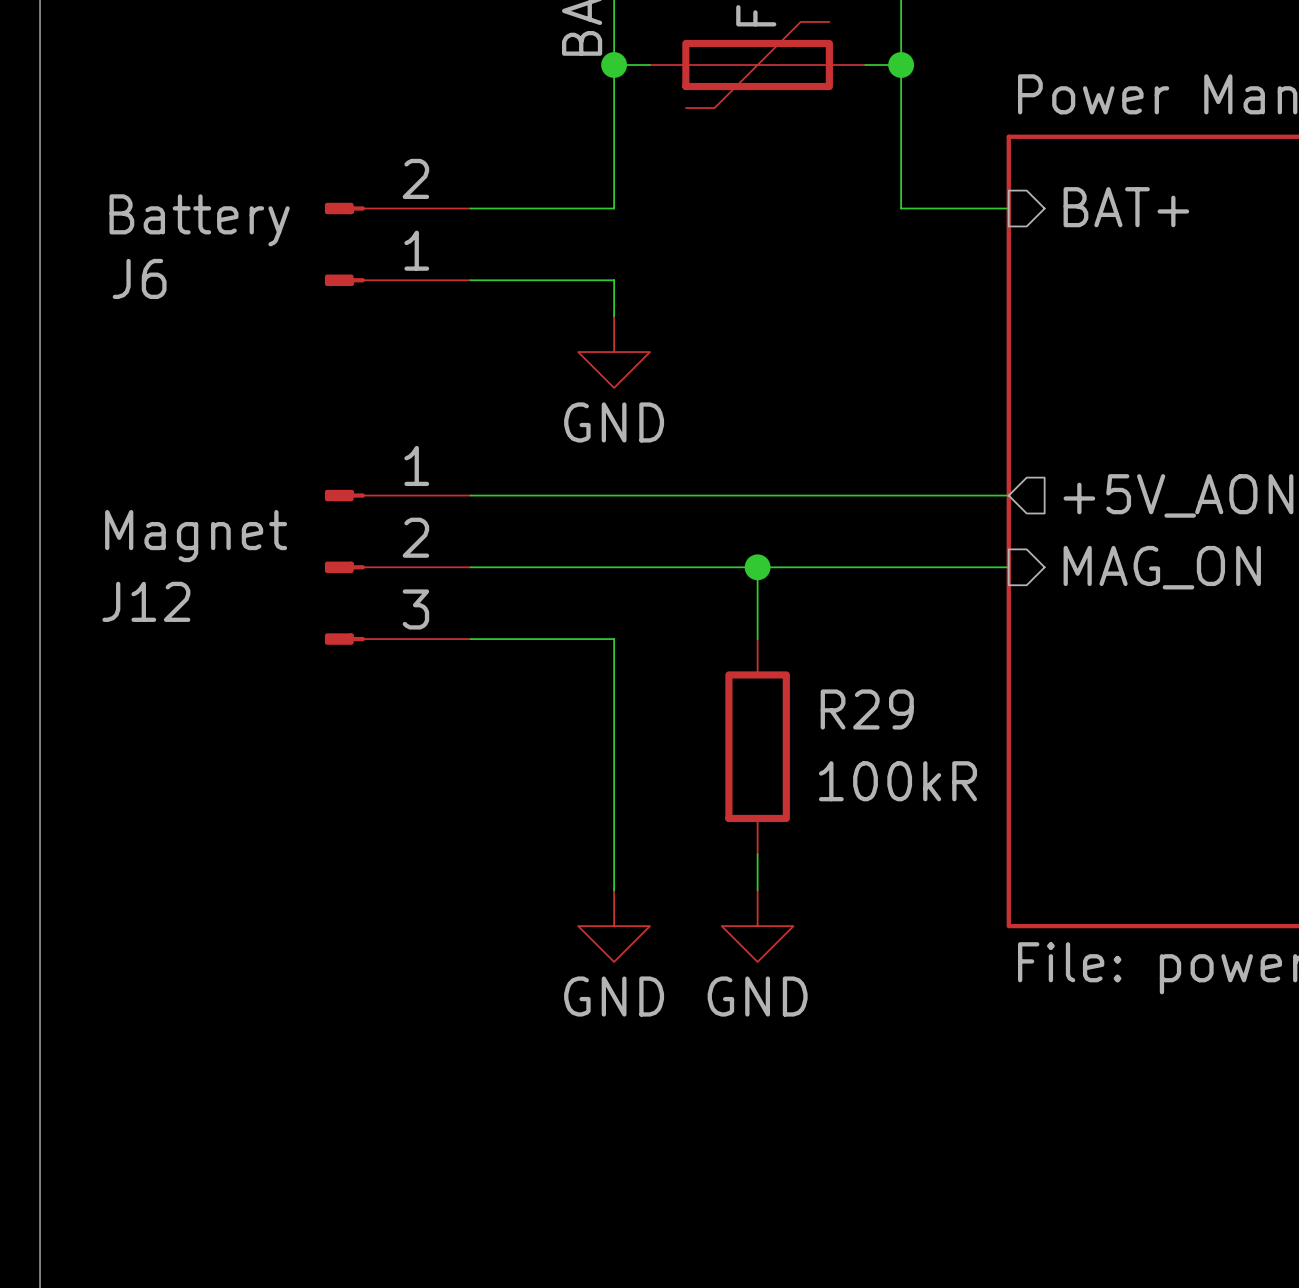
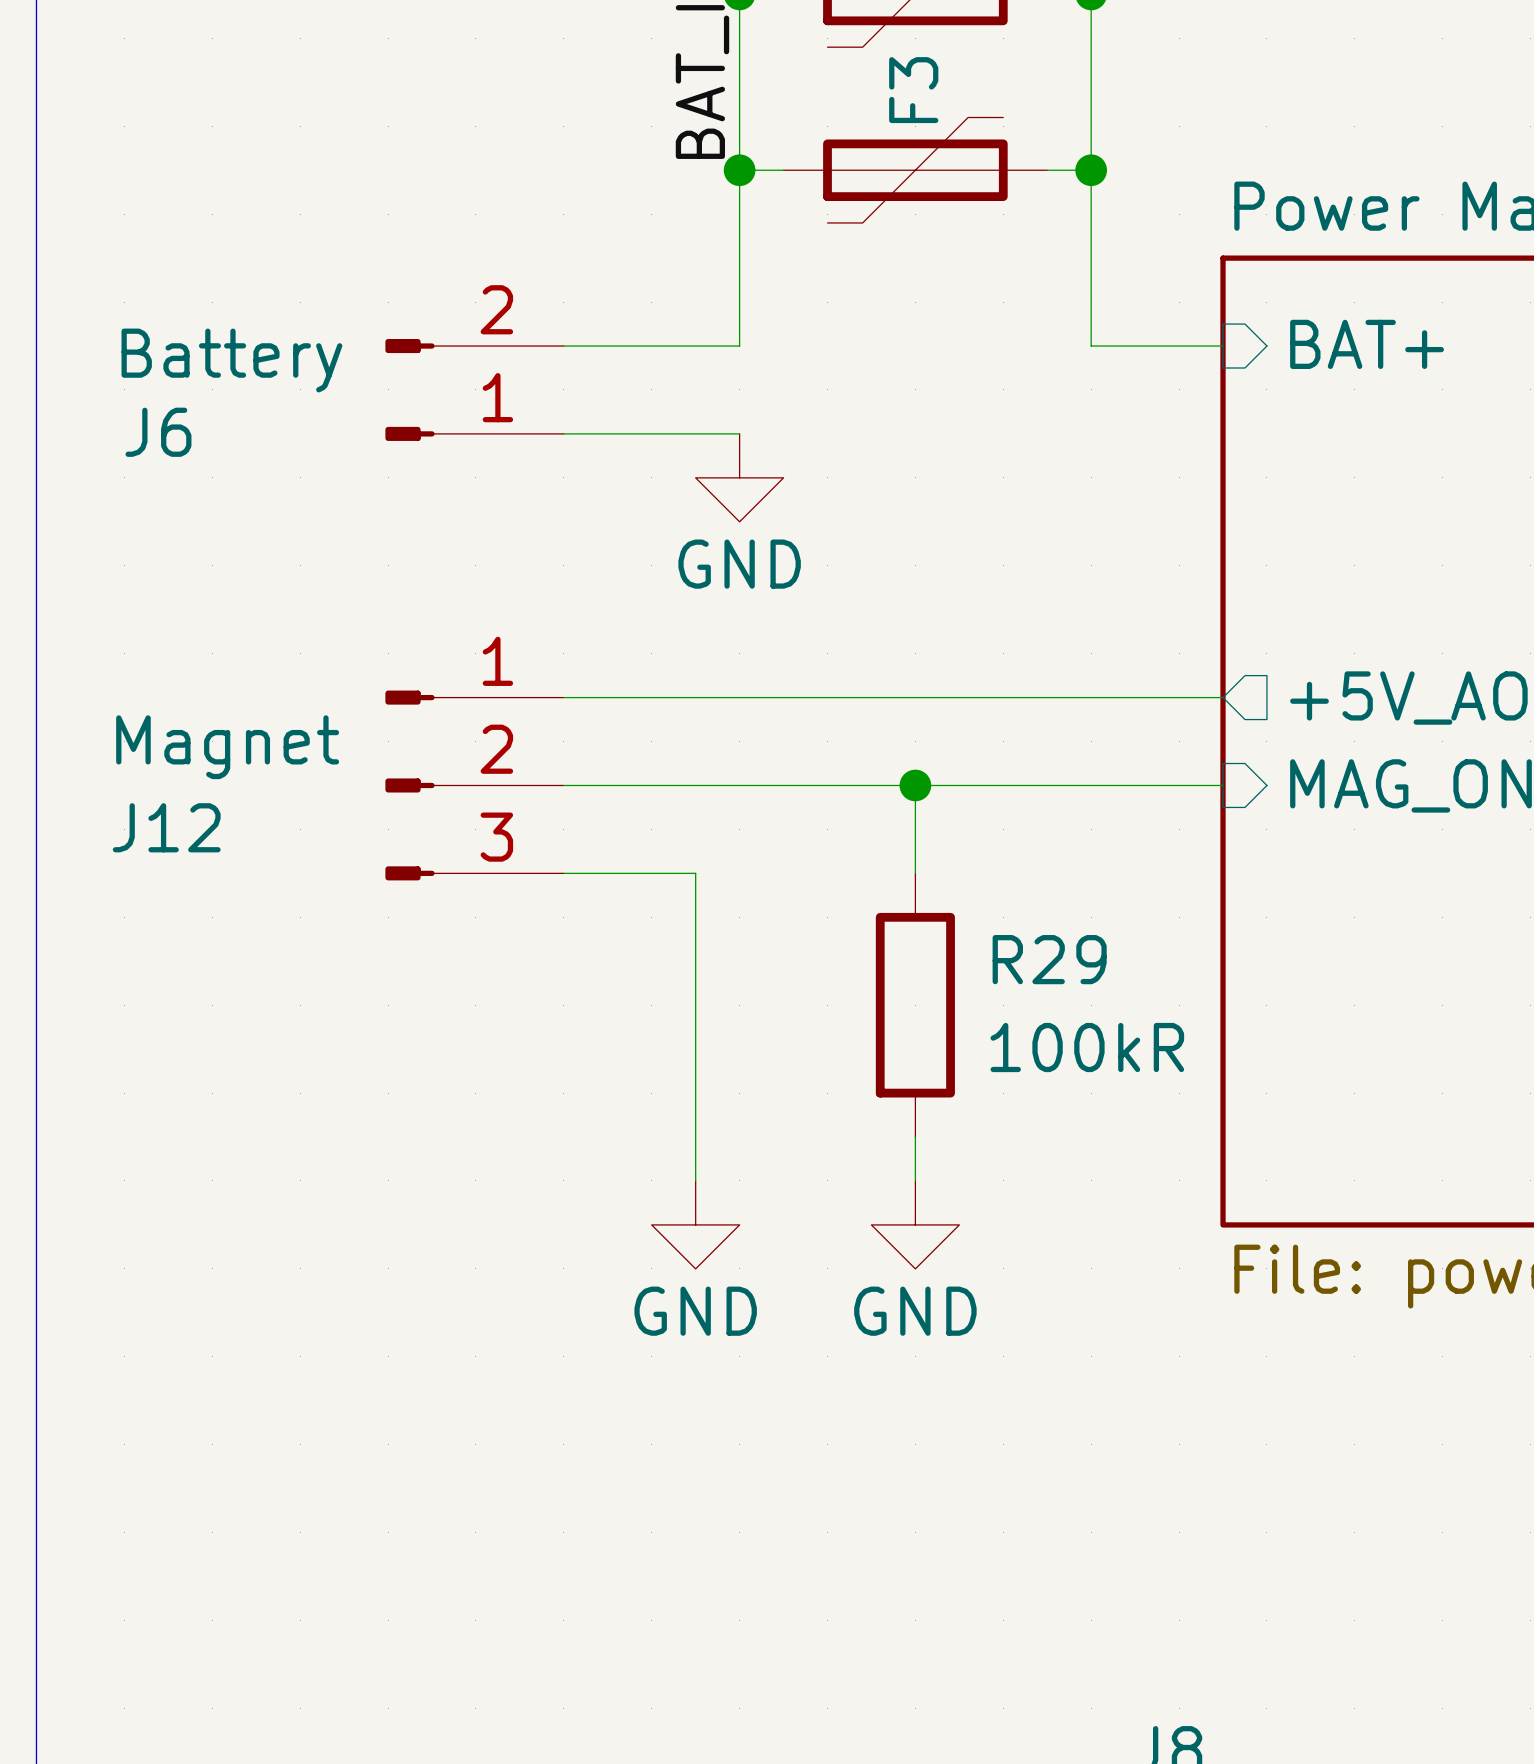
power symbol position: GND (614, 352) -> GND (739, 477)
wire: (578, 639) (614, 639) (614, 890) -> (695, 873) (695, 1180)
power symbol position: GND (614, 926) -> GND (695, 1224)

